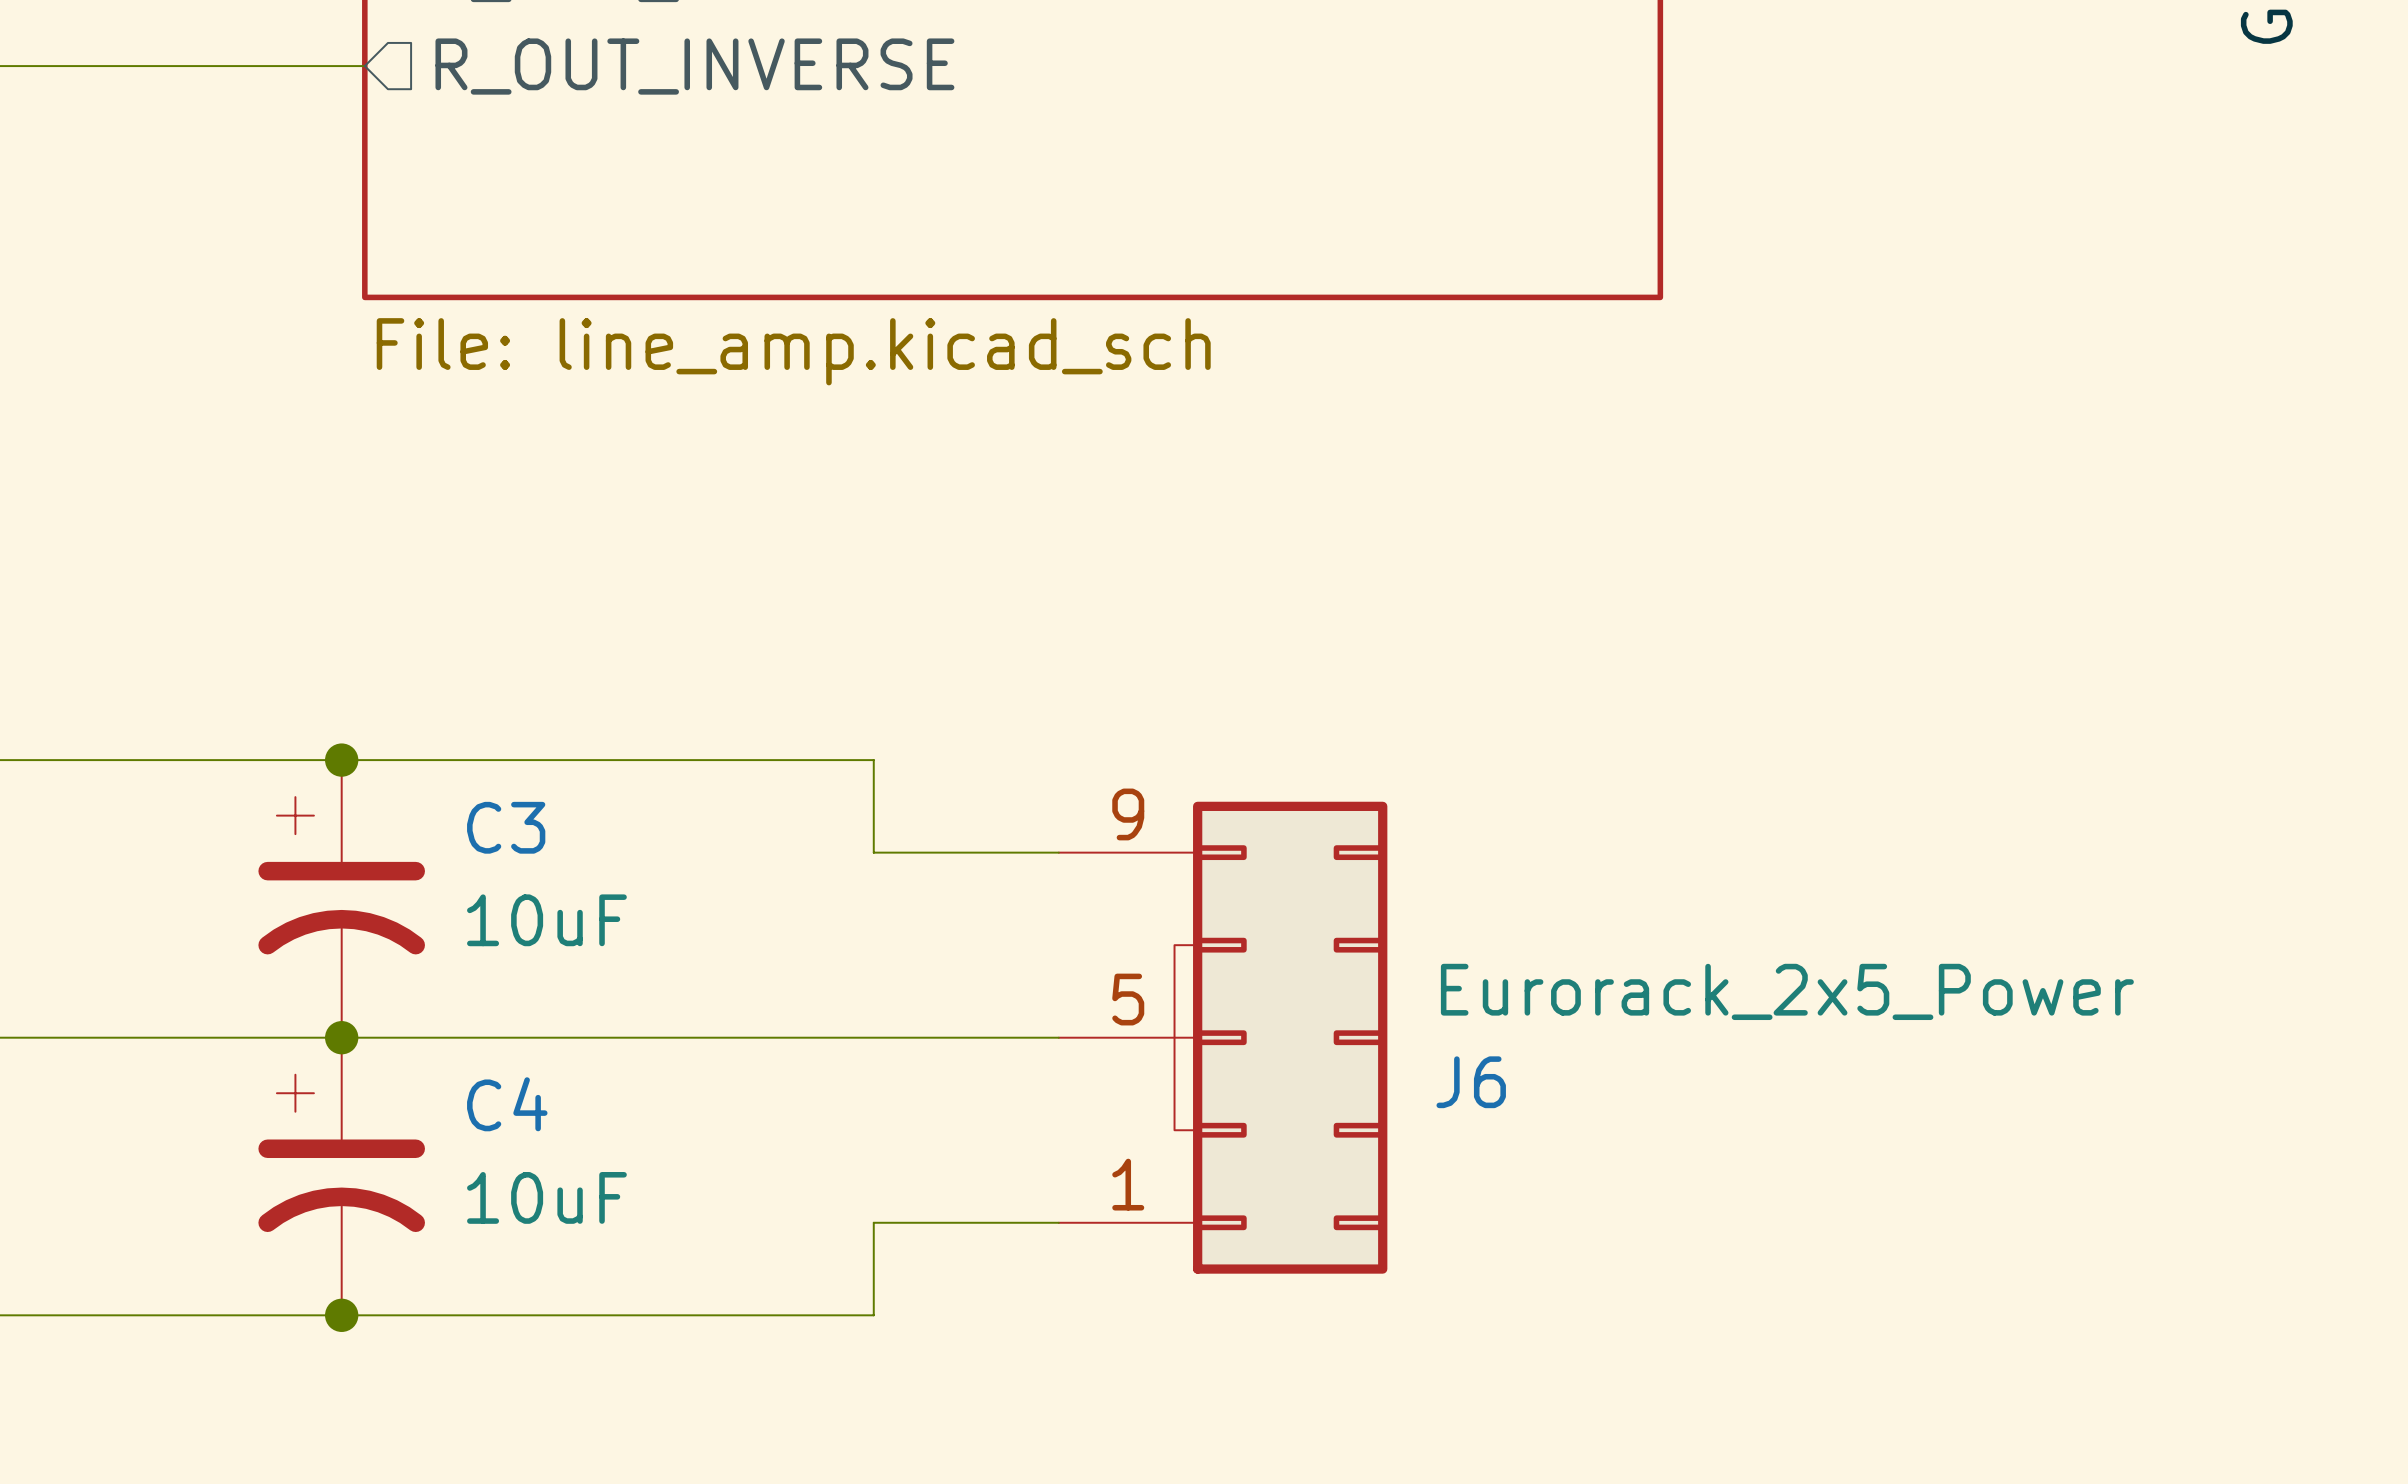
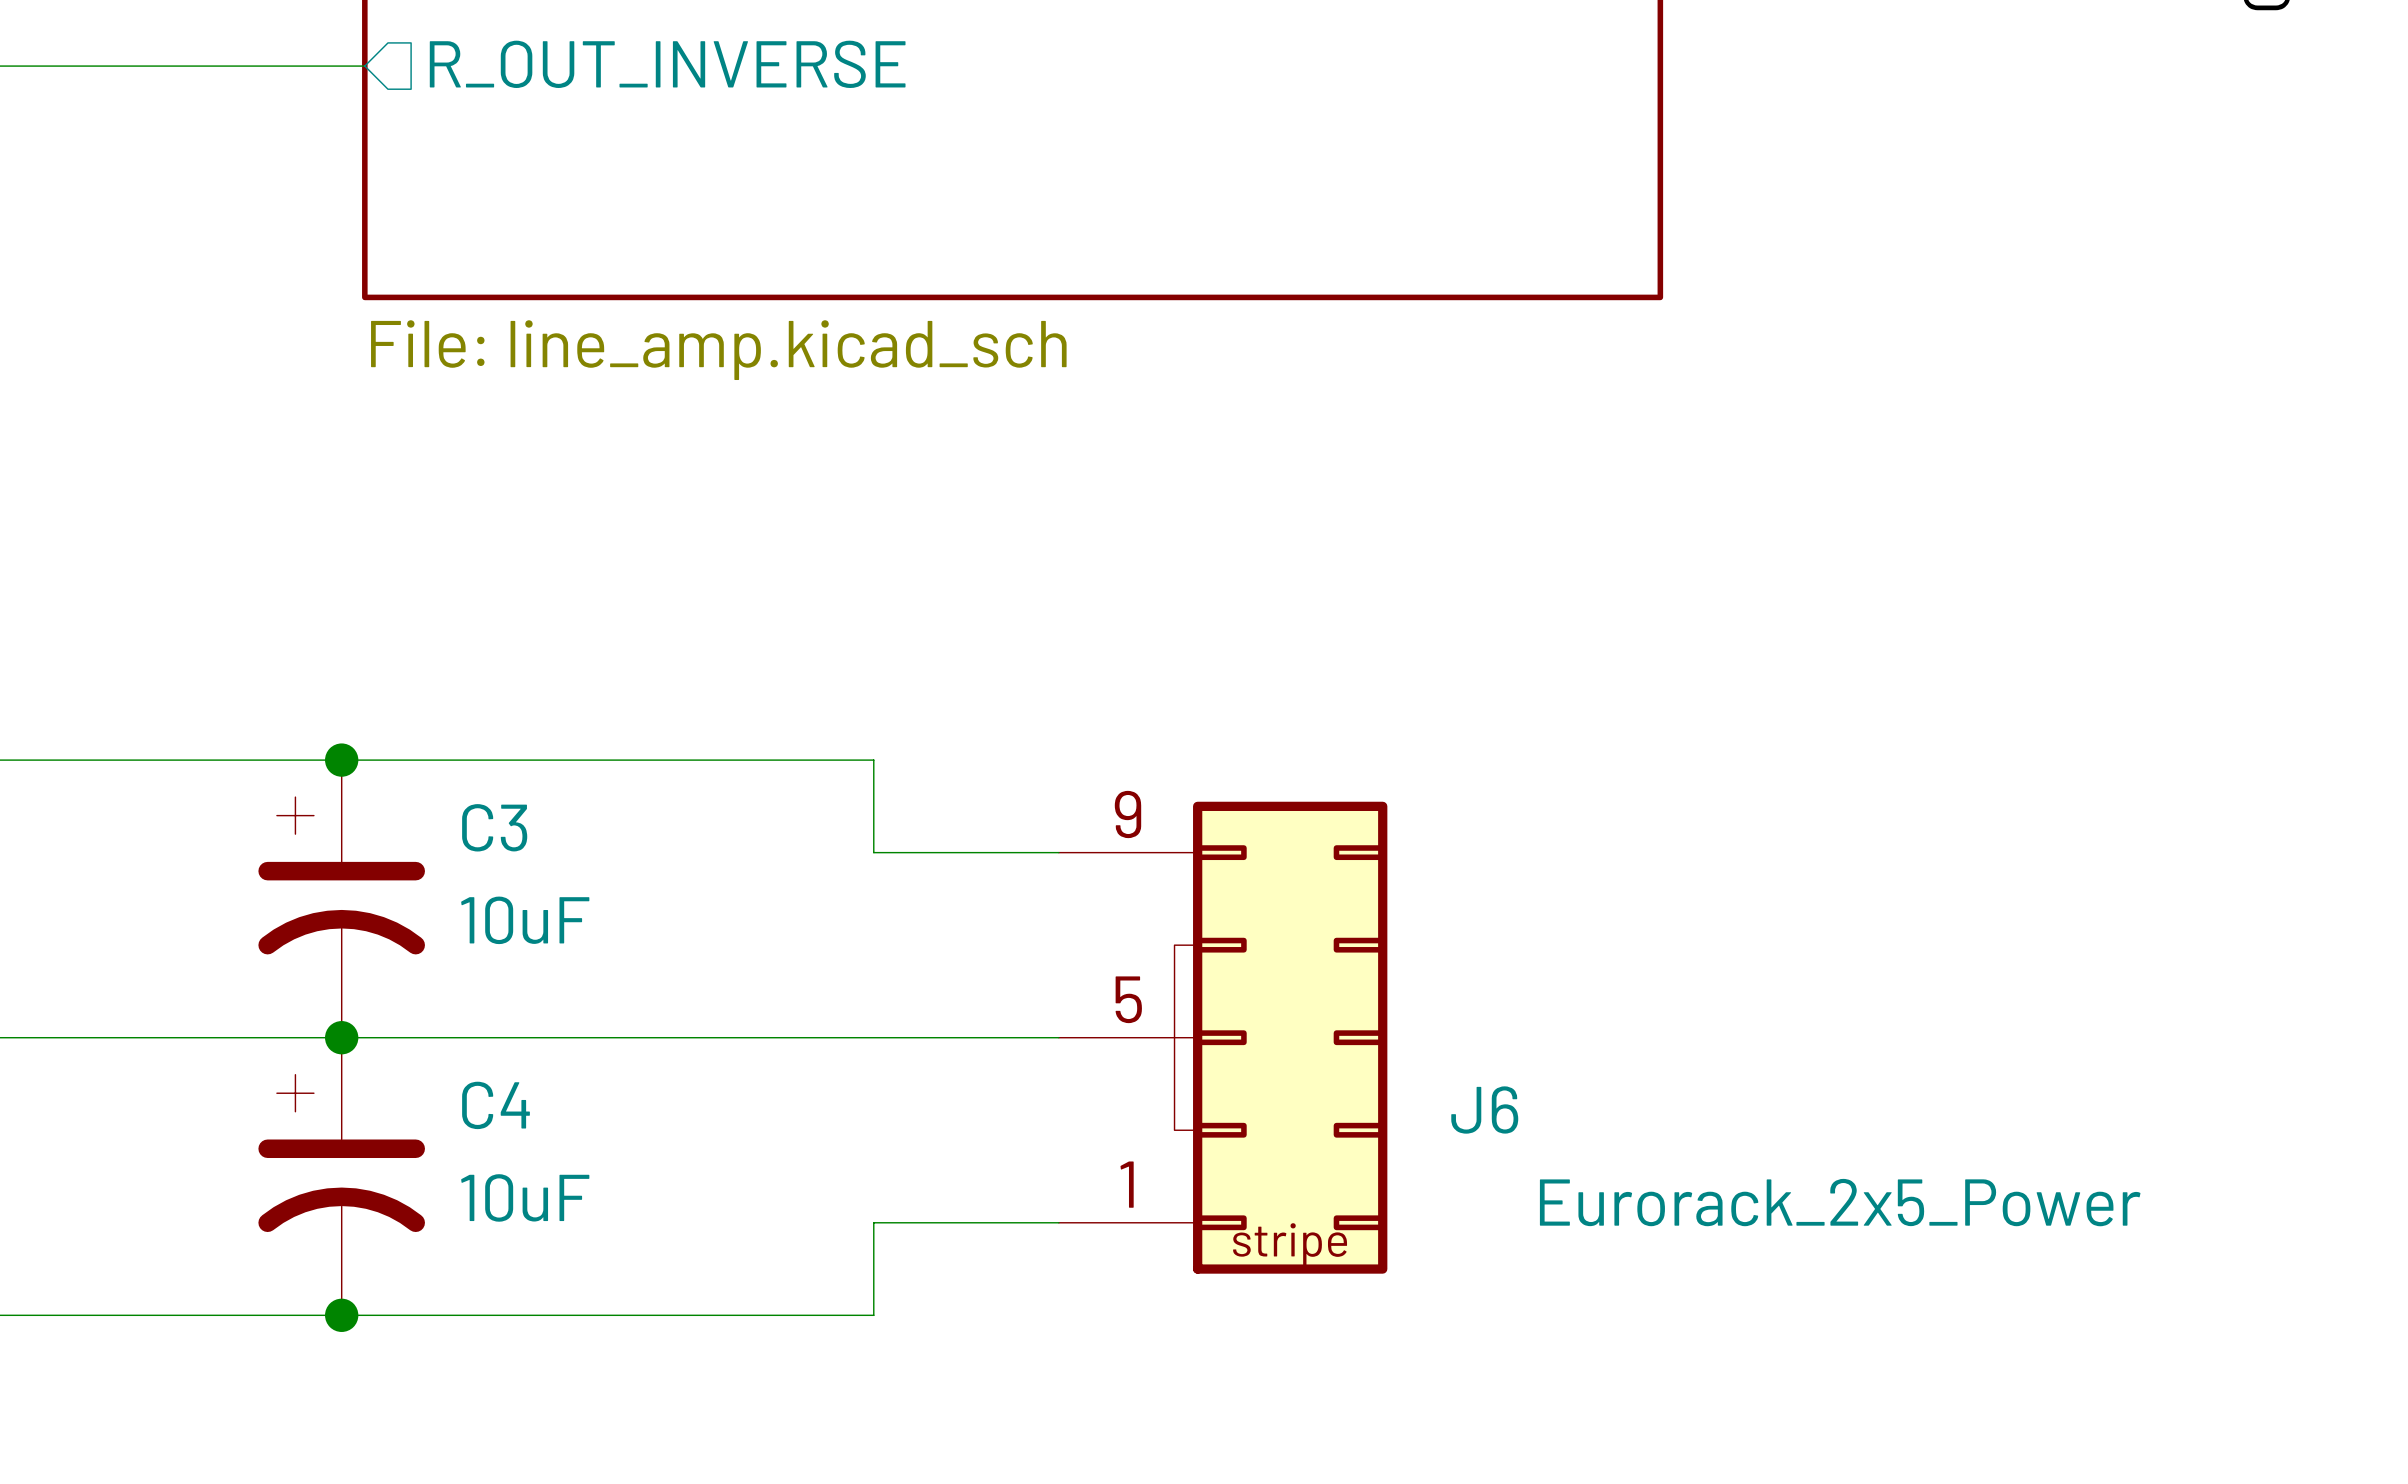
J6 value position: Eurorack_2x5_Power (1787, 991) -> Eurorack_2x5_Power (1840, 1202)
J6 name position: J6 (1471, 1082) -> J6 (1484, 1110)
J6 text: none -> stripe (1290, 1244)

